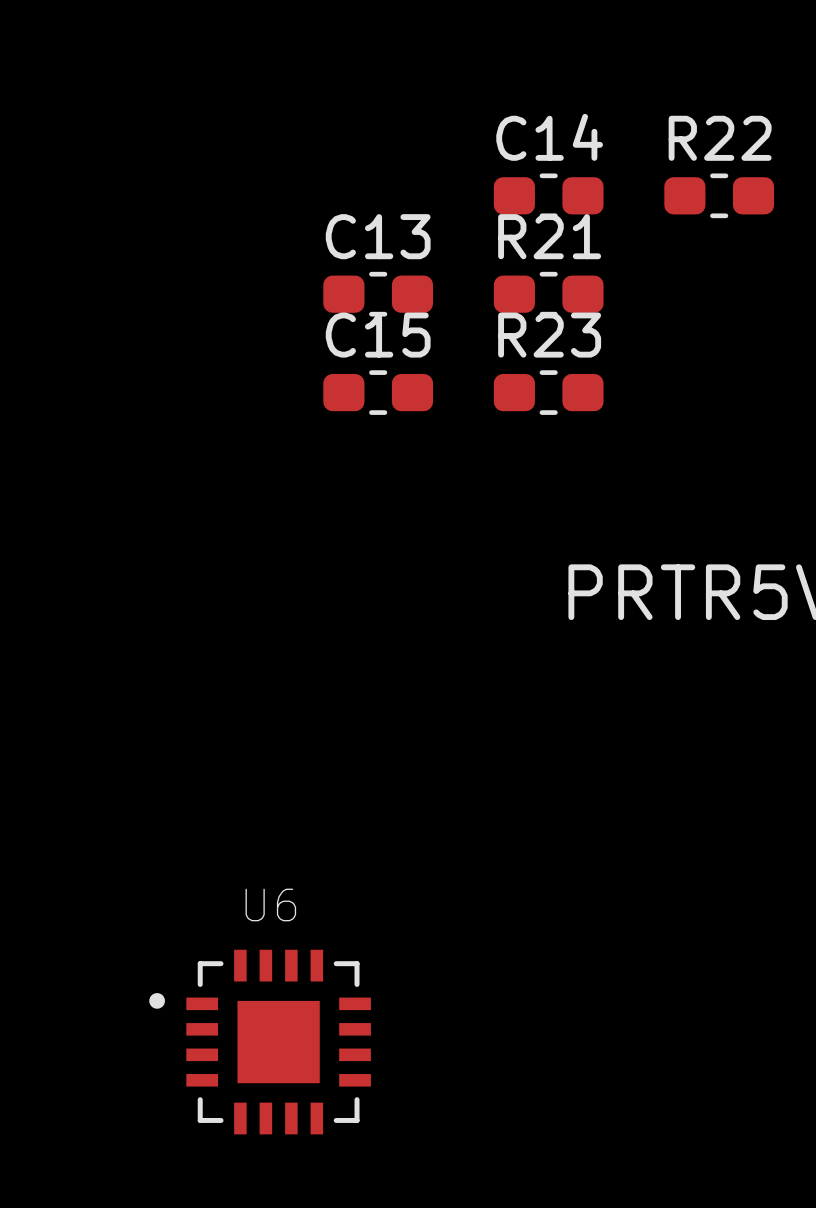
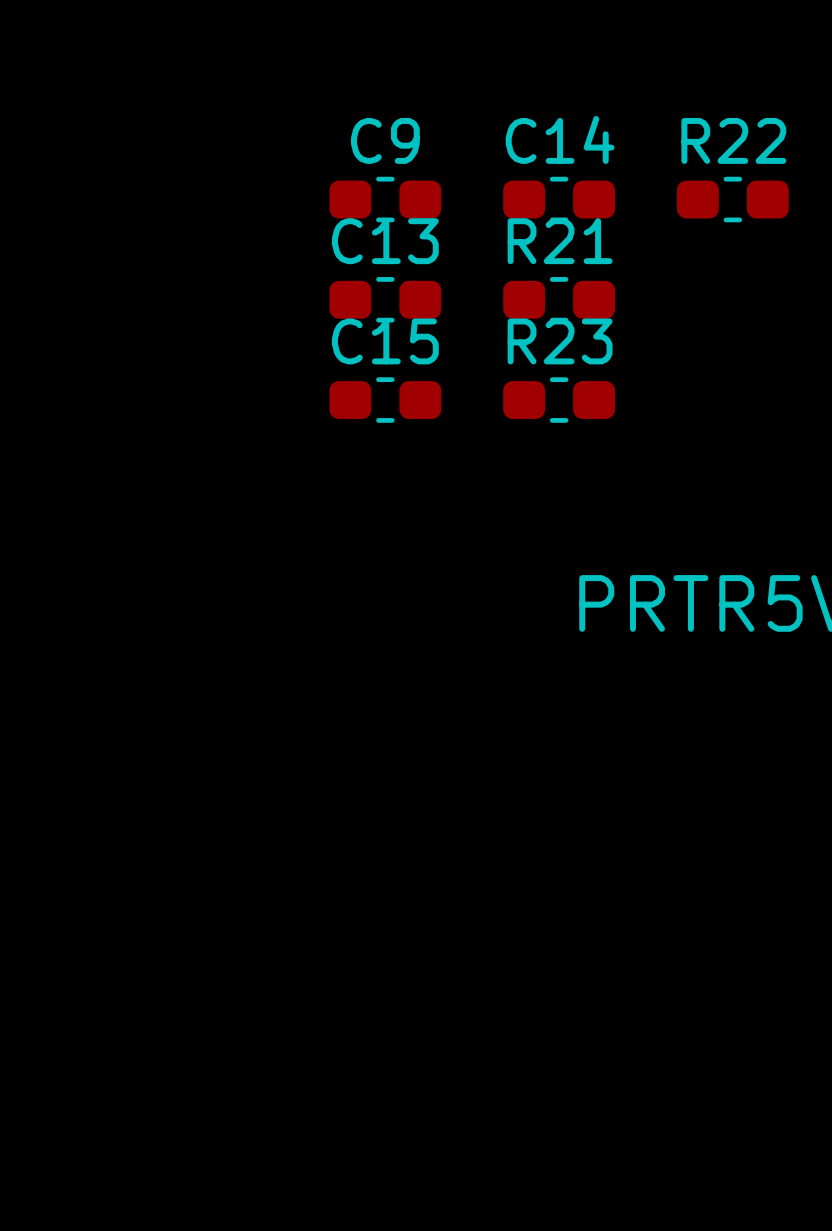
C9: none -> (385, 199)
U6: (260, 1042) -> none

